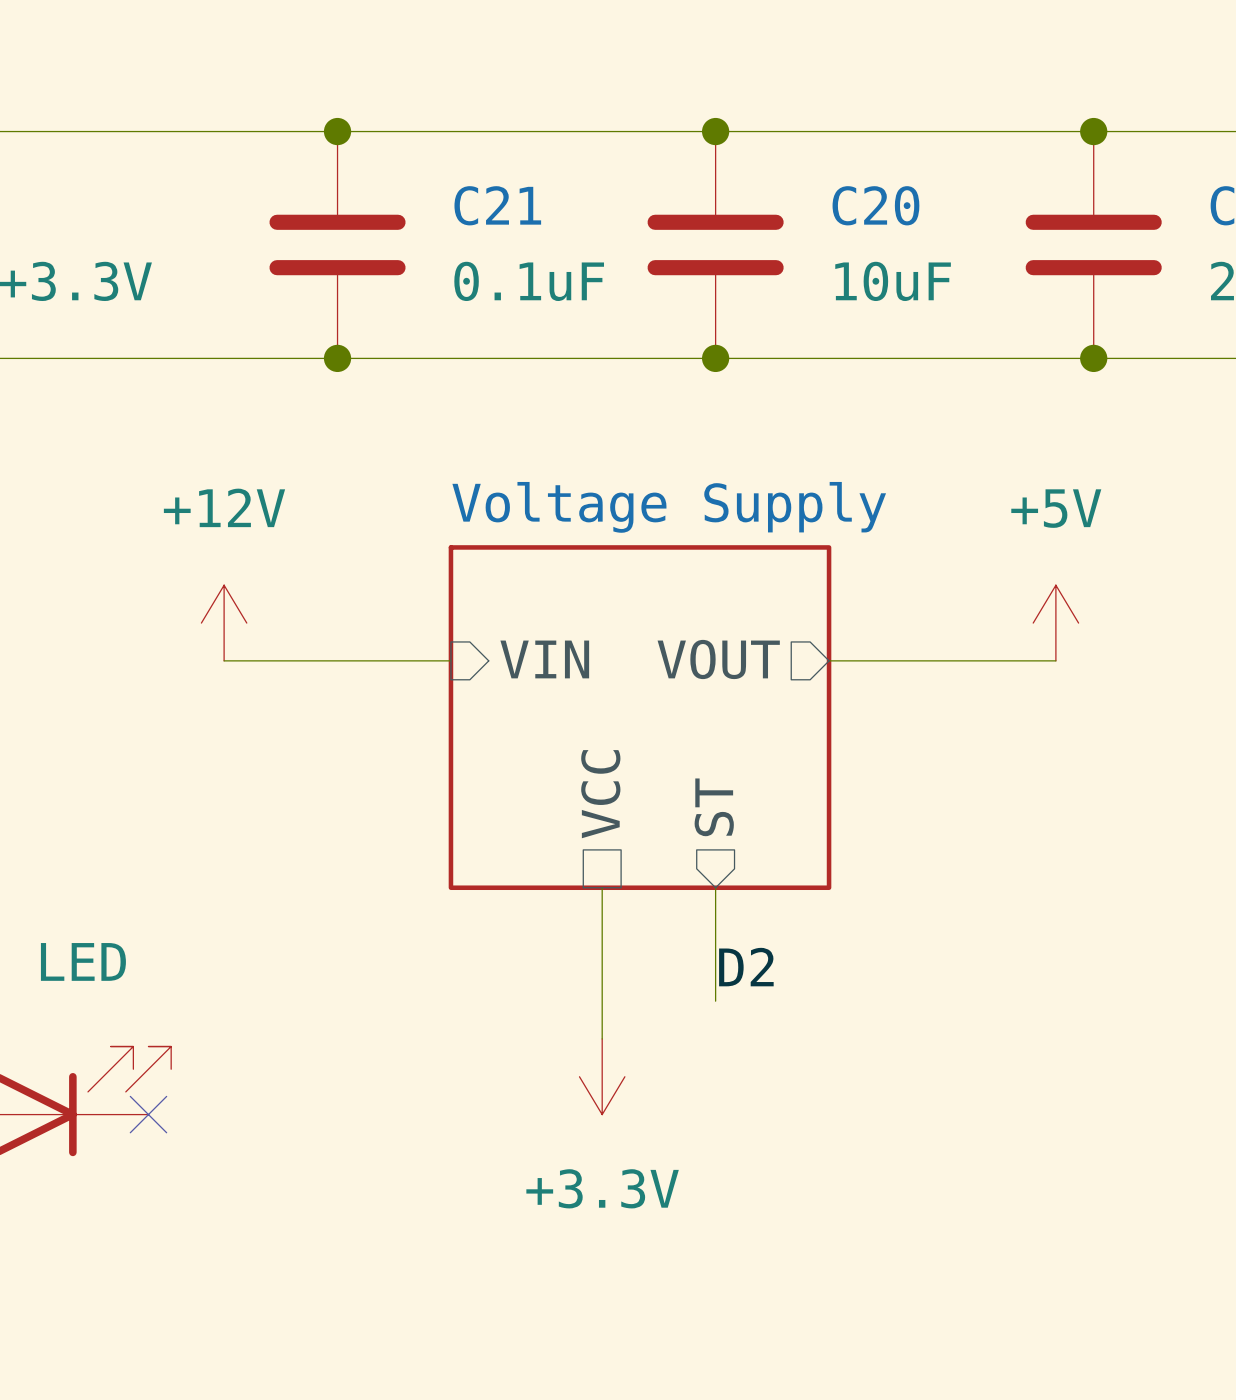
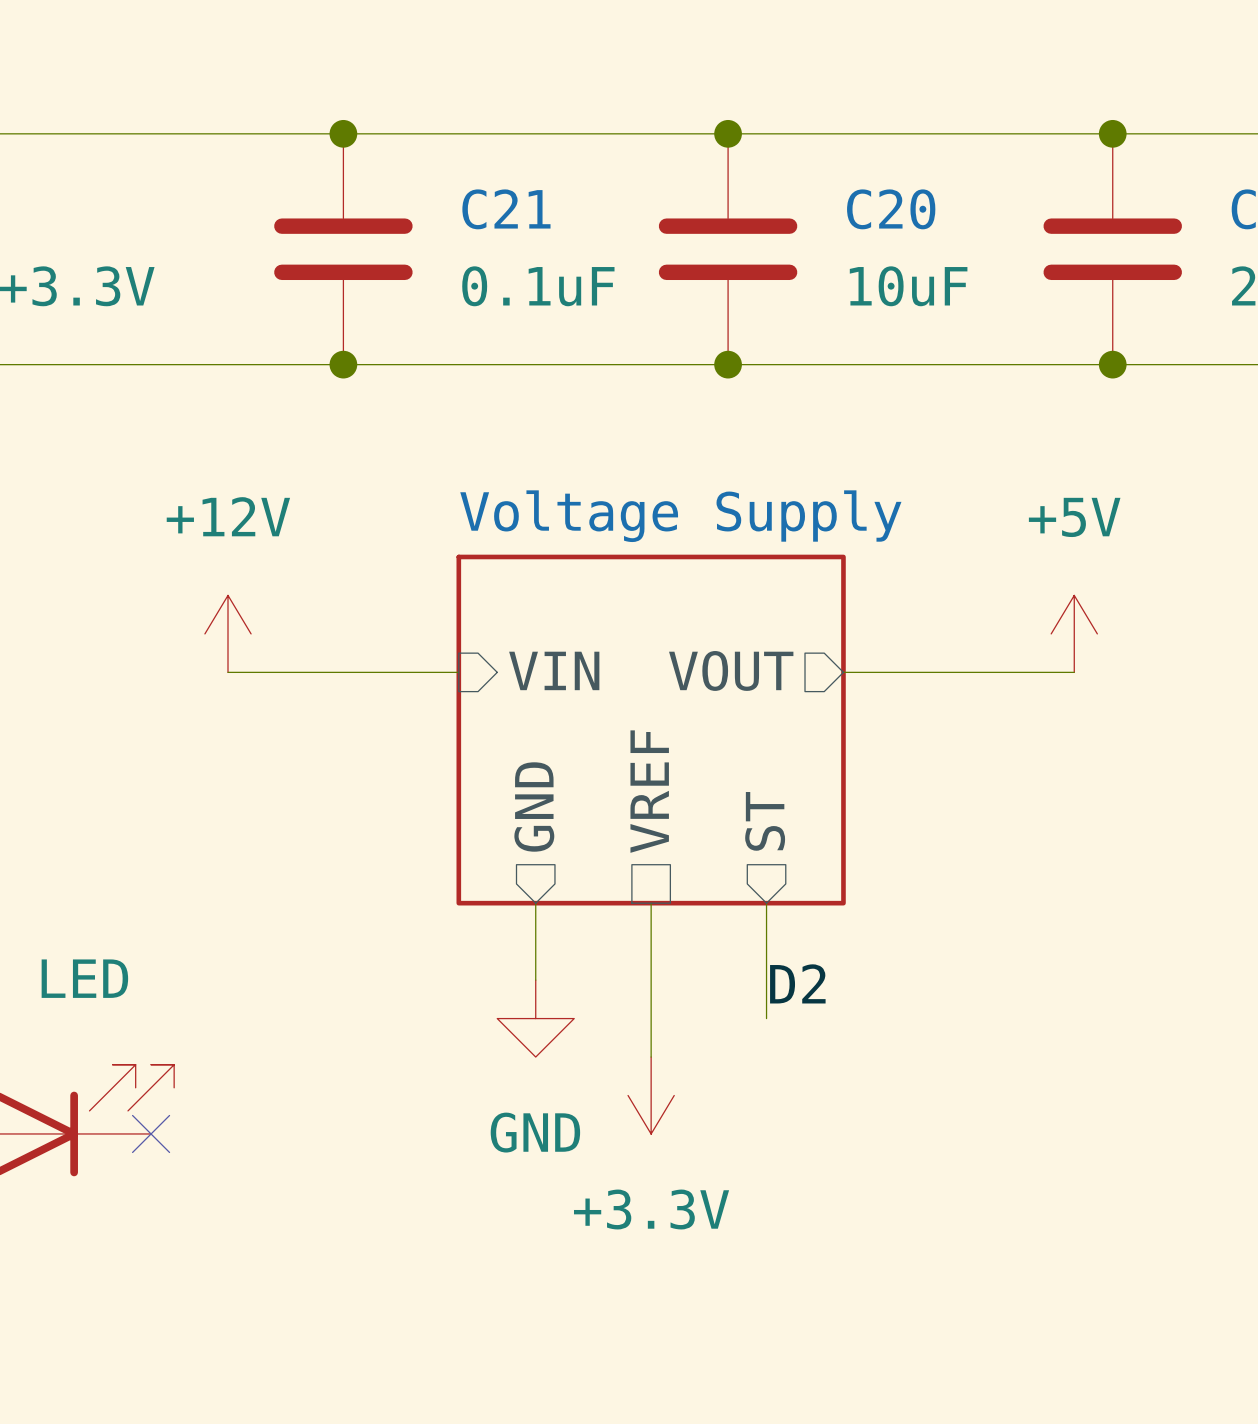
sheet pin: none -> VREF (649, 791)
sheet pin: none -> GND (534, 806)
sheet pin: VCC (600, 794) -> none
sheet pin position: ST (714, 807) -> ST (765, 821)
wire: none -> (535, 903) (535, 980)
wire: (602, 887) (602, 1038) -> (651, 903) (651, 1057)
wire: (715, 887) (715, 1001) -> (766, 903) (766, 1018)
label position: D2 (746, 967) -> D2 (797, 983)
power symbol: none -> GND (535, 1018)
power symbol position: +3.3V (602, 1076) -> +3.3V (651, 1095)

